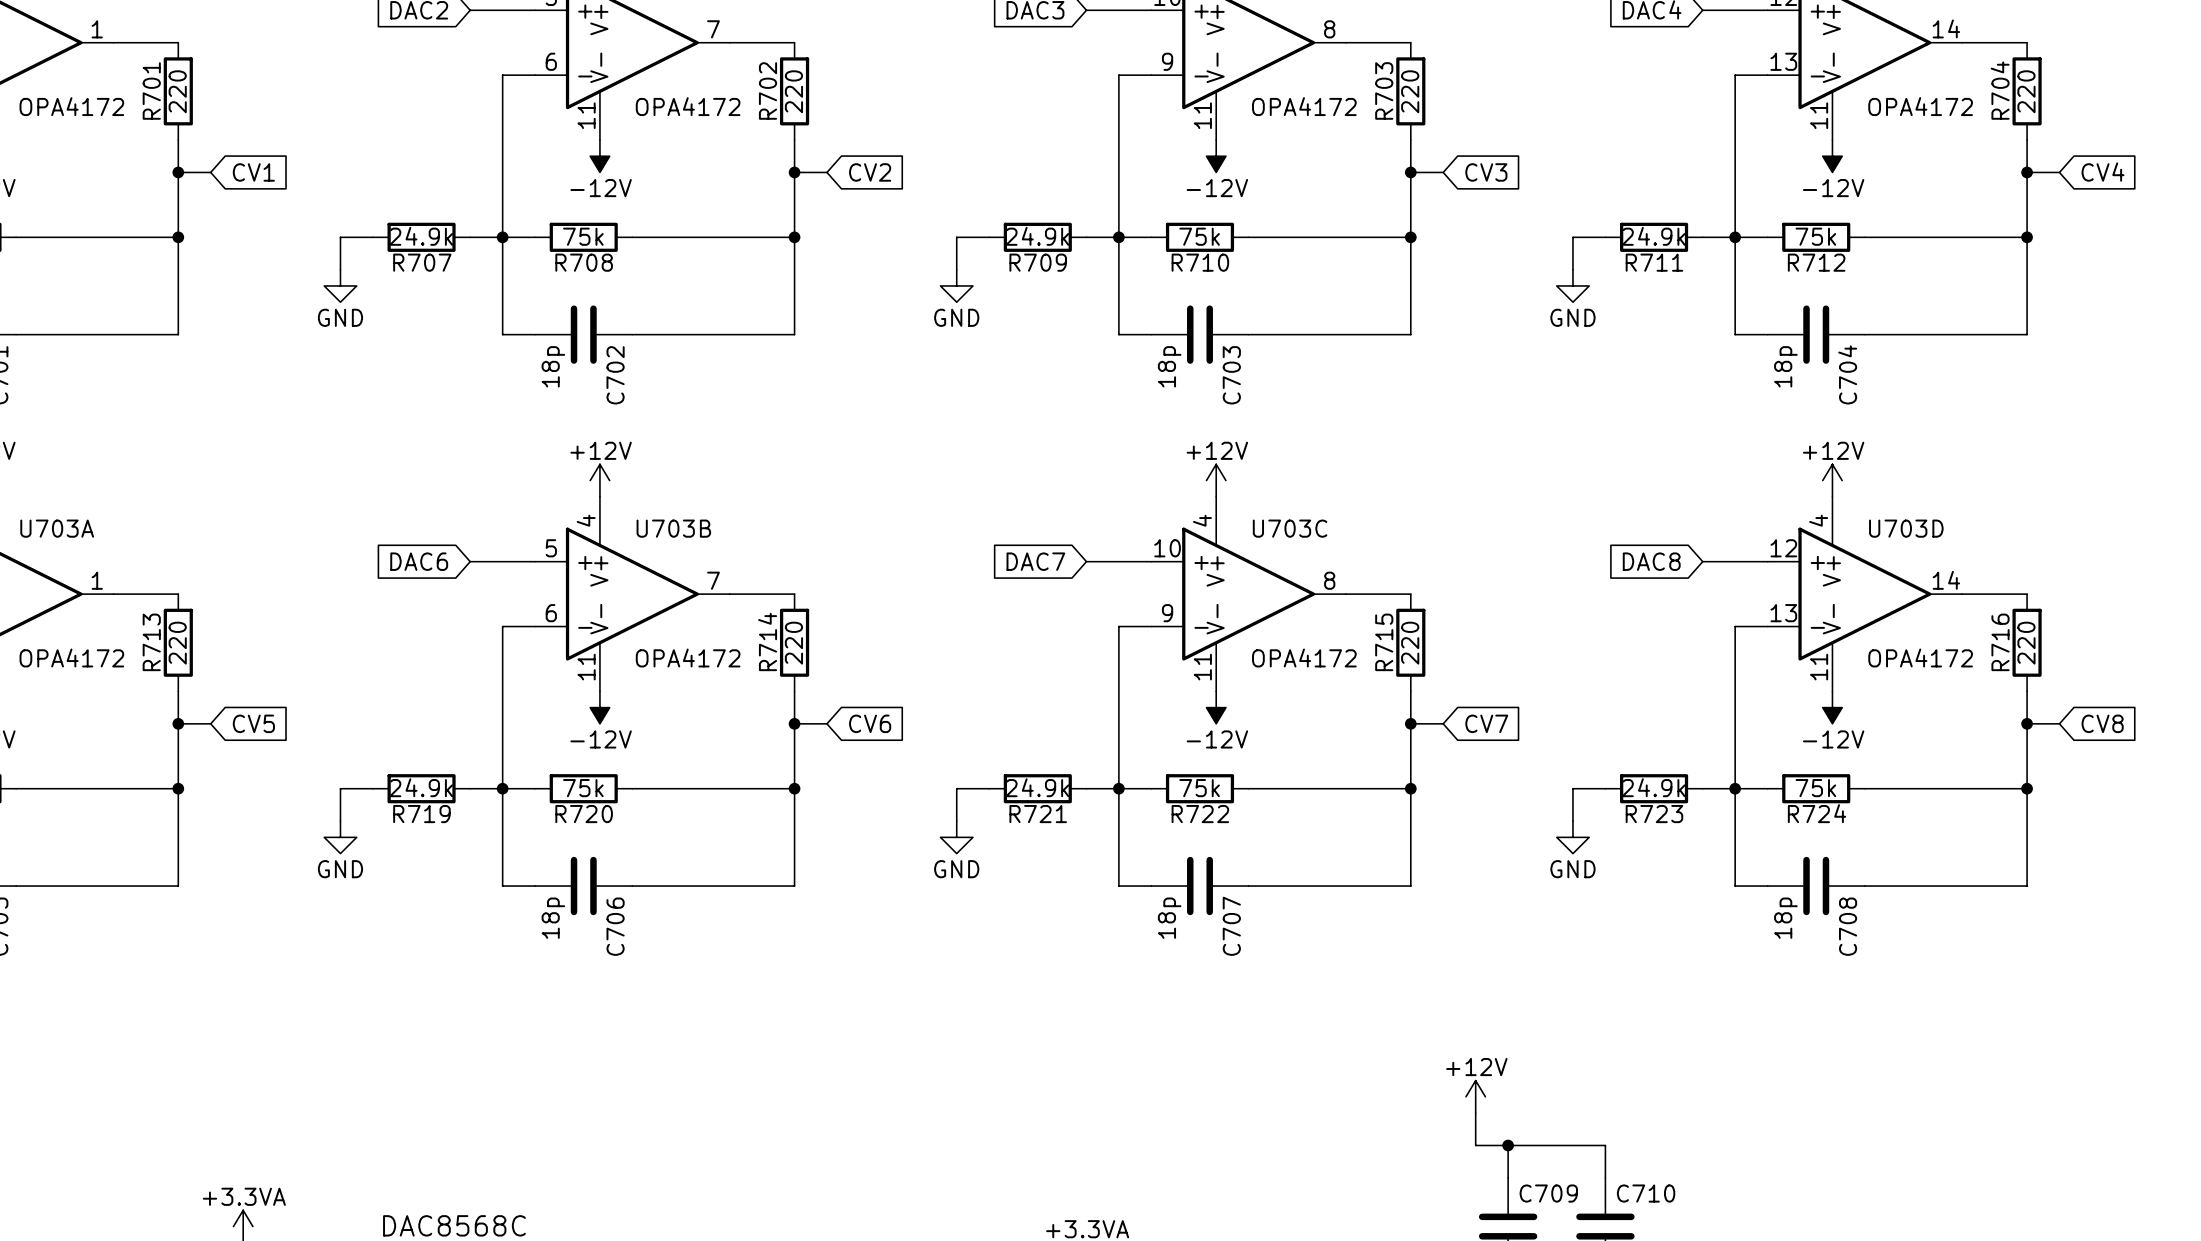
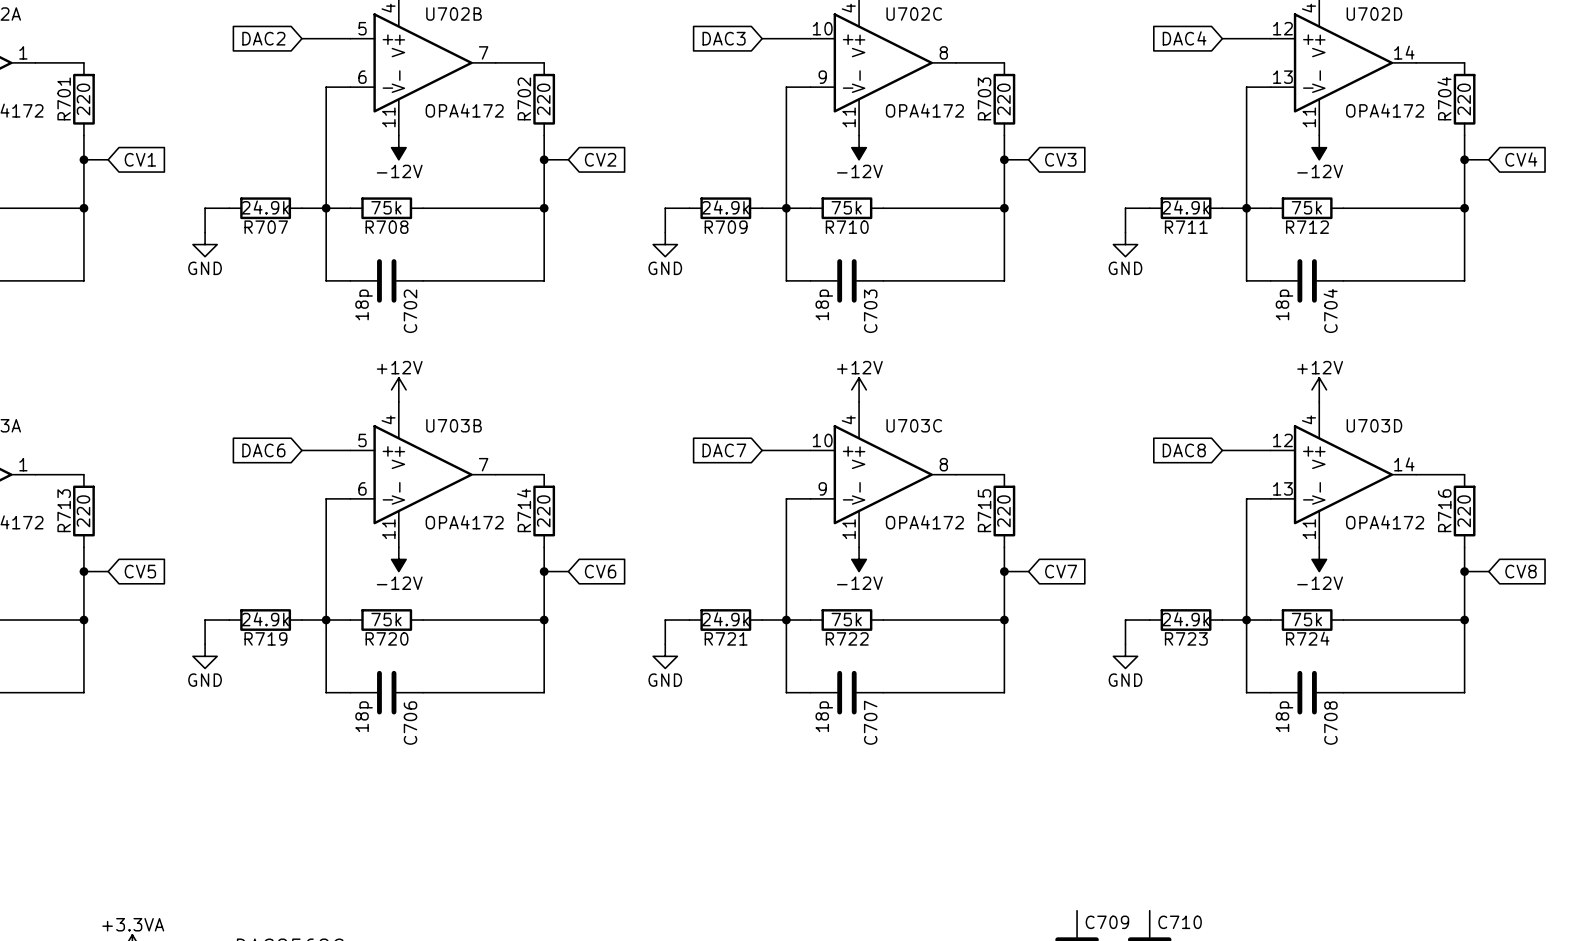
power symbol: +12V (1475, 1096) -> none
wire: (1475, 1113) (1475, 1145) (1605, 1145) (1605, 1177) -> none
wire: (1508, 1145) (1508, 1177) -> none
junction: (1508, 1145) -> none

